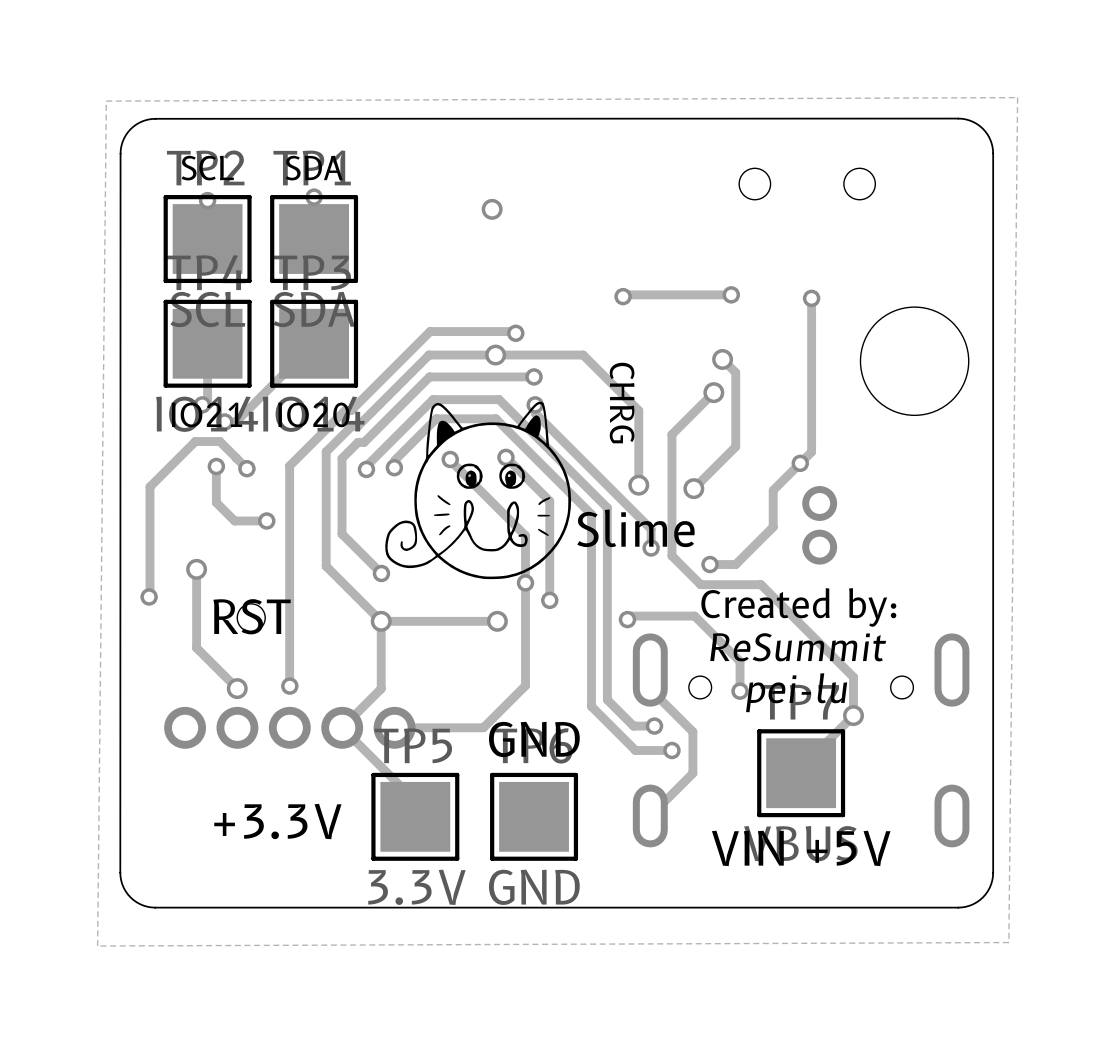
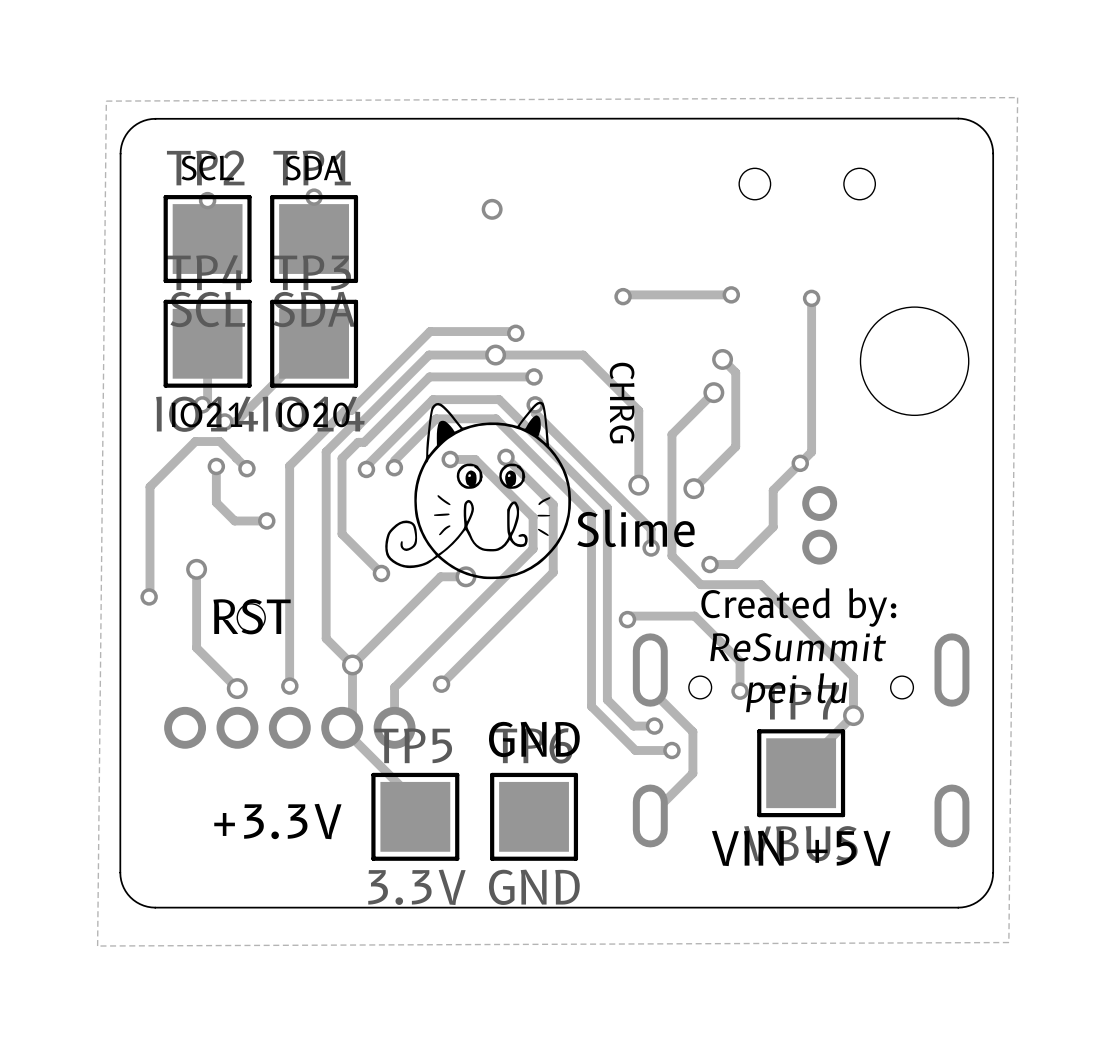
track: (450, 459) (525, 535) (525, 685) (483, 727) (394, 727) -> (450, 459) (475, 459) (533, 517) (533, 548) (394, 687) (394, 727)
track: (549, 501) (549, 600) -> (549, 501) (553, 504) (553, 572) (441, 684)
track: (326, 566) (381, 621) -> (326, 566) (326, 638) (352, 664)
track: none -> (465, 576) (440, 576) (352, 664)
via: none -> (465, 576)
via: (525, 582) -> none
via: (549, 600) -> none
track: (381, 621) (381, 688) (352, 717) -> (352, 664) (352, 717)
via: (381, 621) -> none
track: (497, 621) (381, 621) -> none
via: (497, 621) -> none
via: none -> (352, 664)
via: none -> (441, 684)

